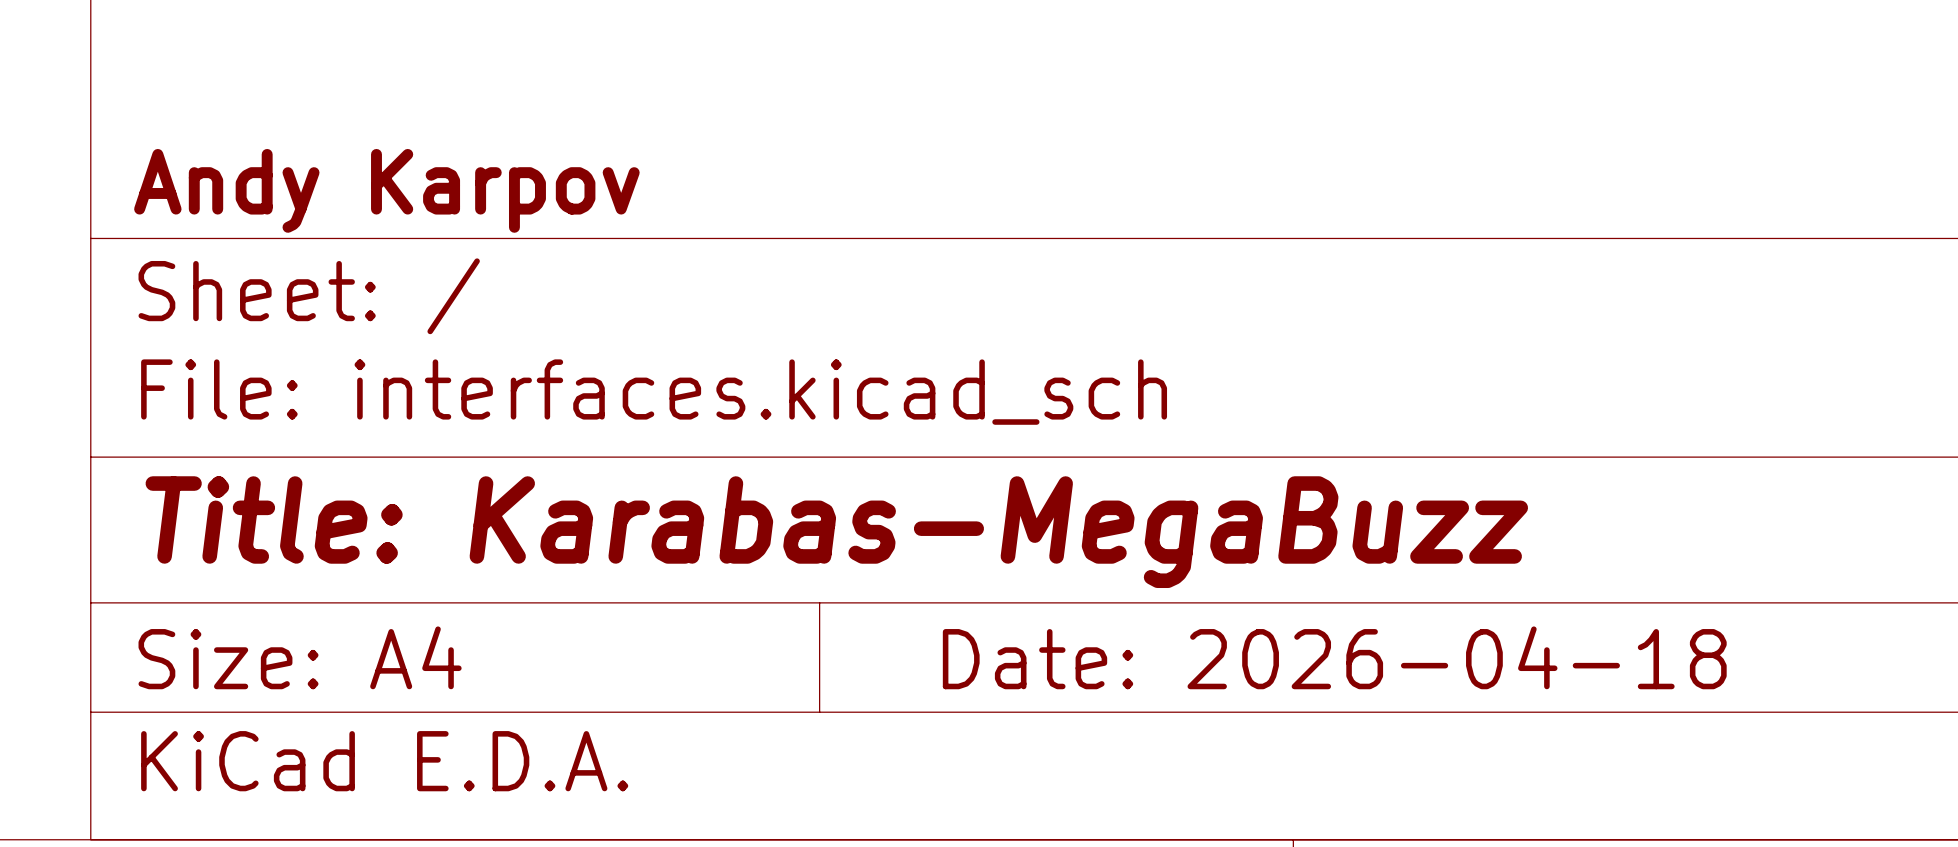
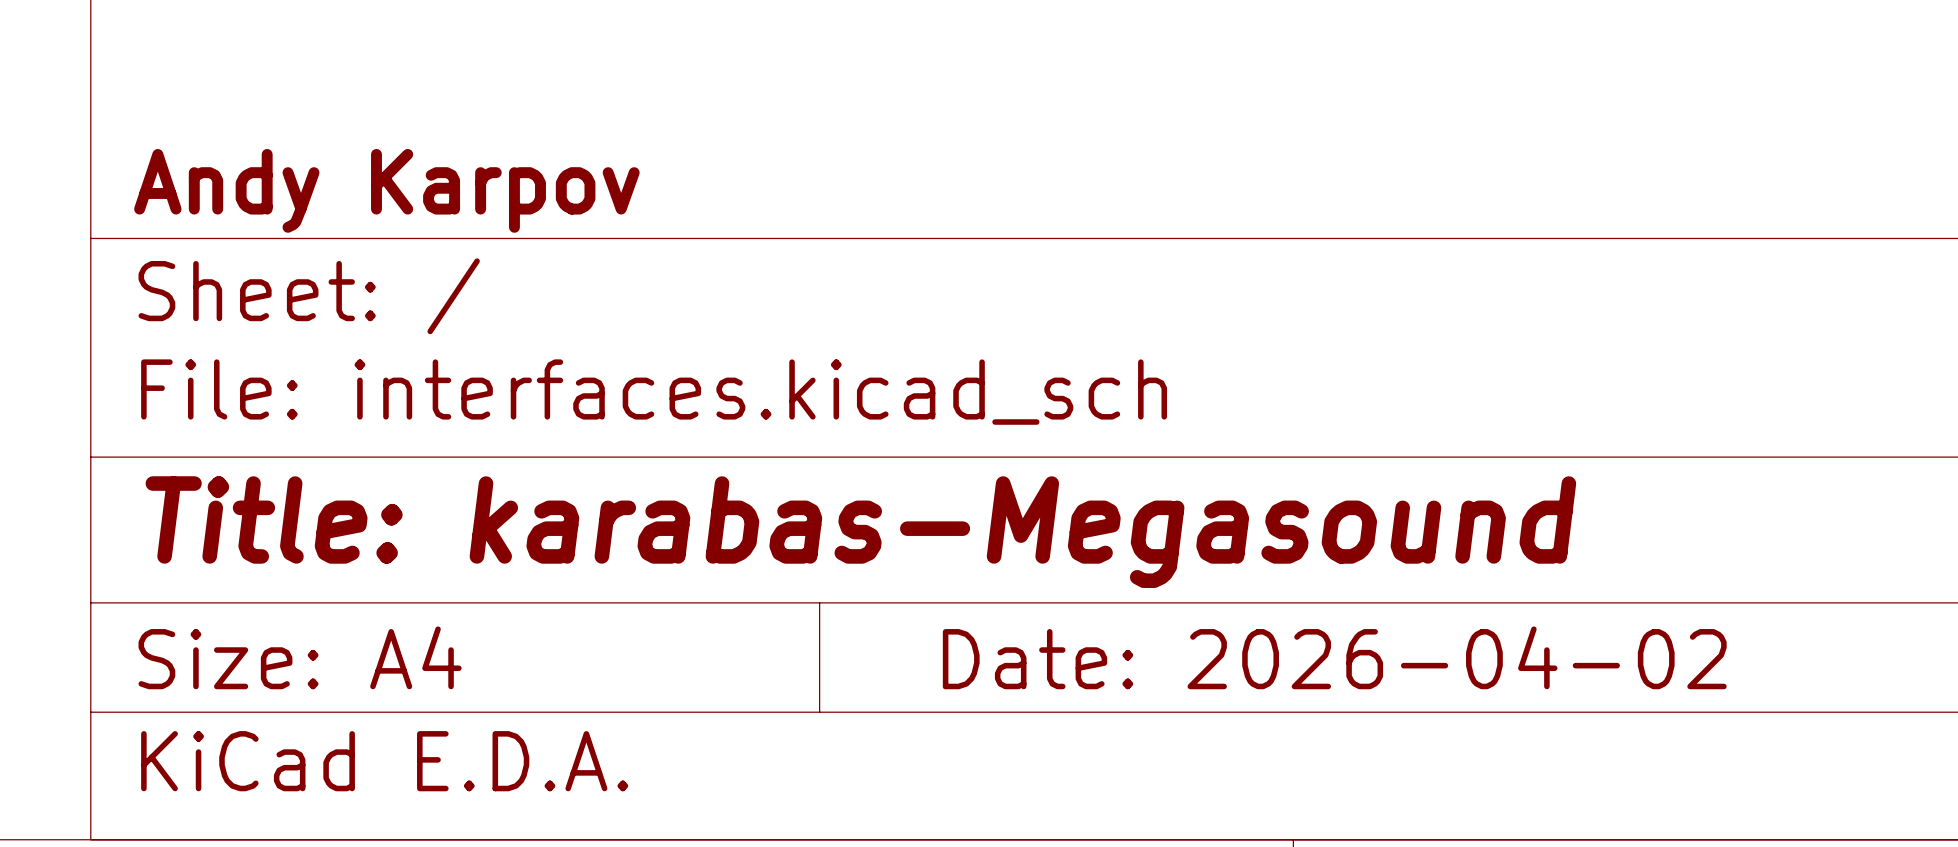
title block: Title: Karabas-MegaBuzz (836, 532) -> Title: karabas-Megasound (860, 532)
title block: Date: 2026-04-18 (1334, 657) -> Date: 2026-04-02 (1334, 657)

